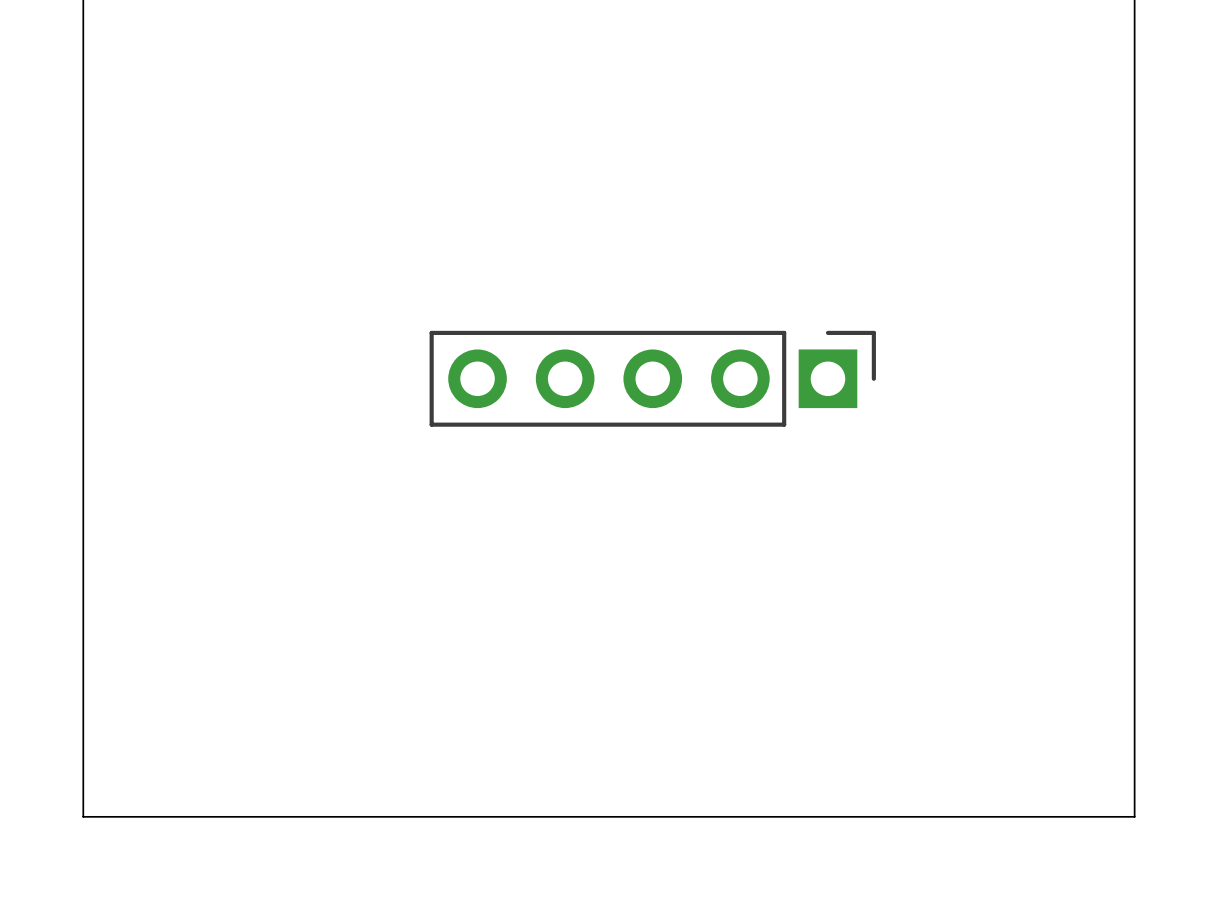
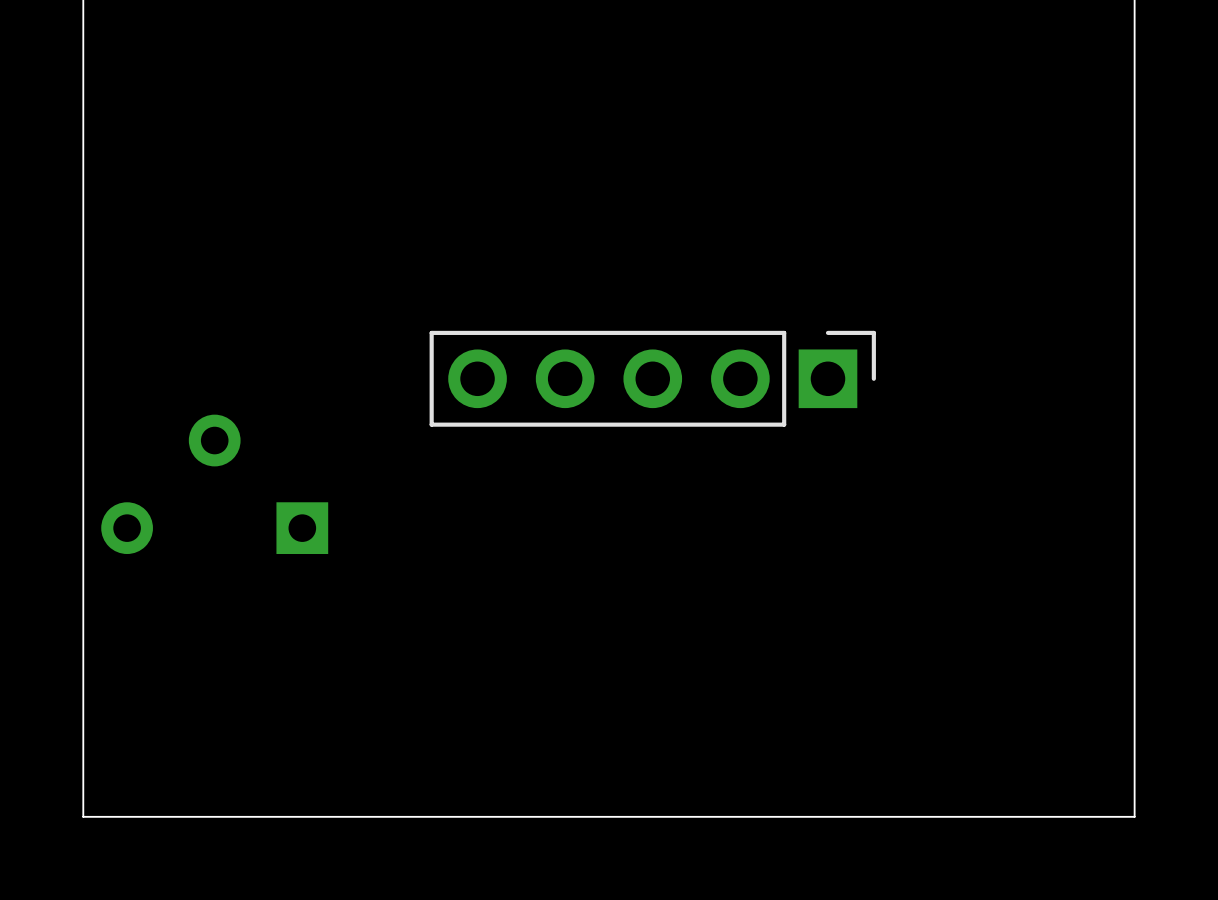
part: none -> (214, 484)

